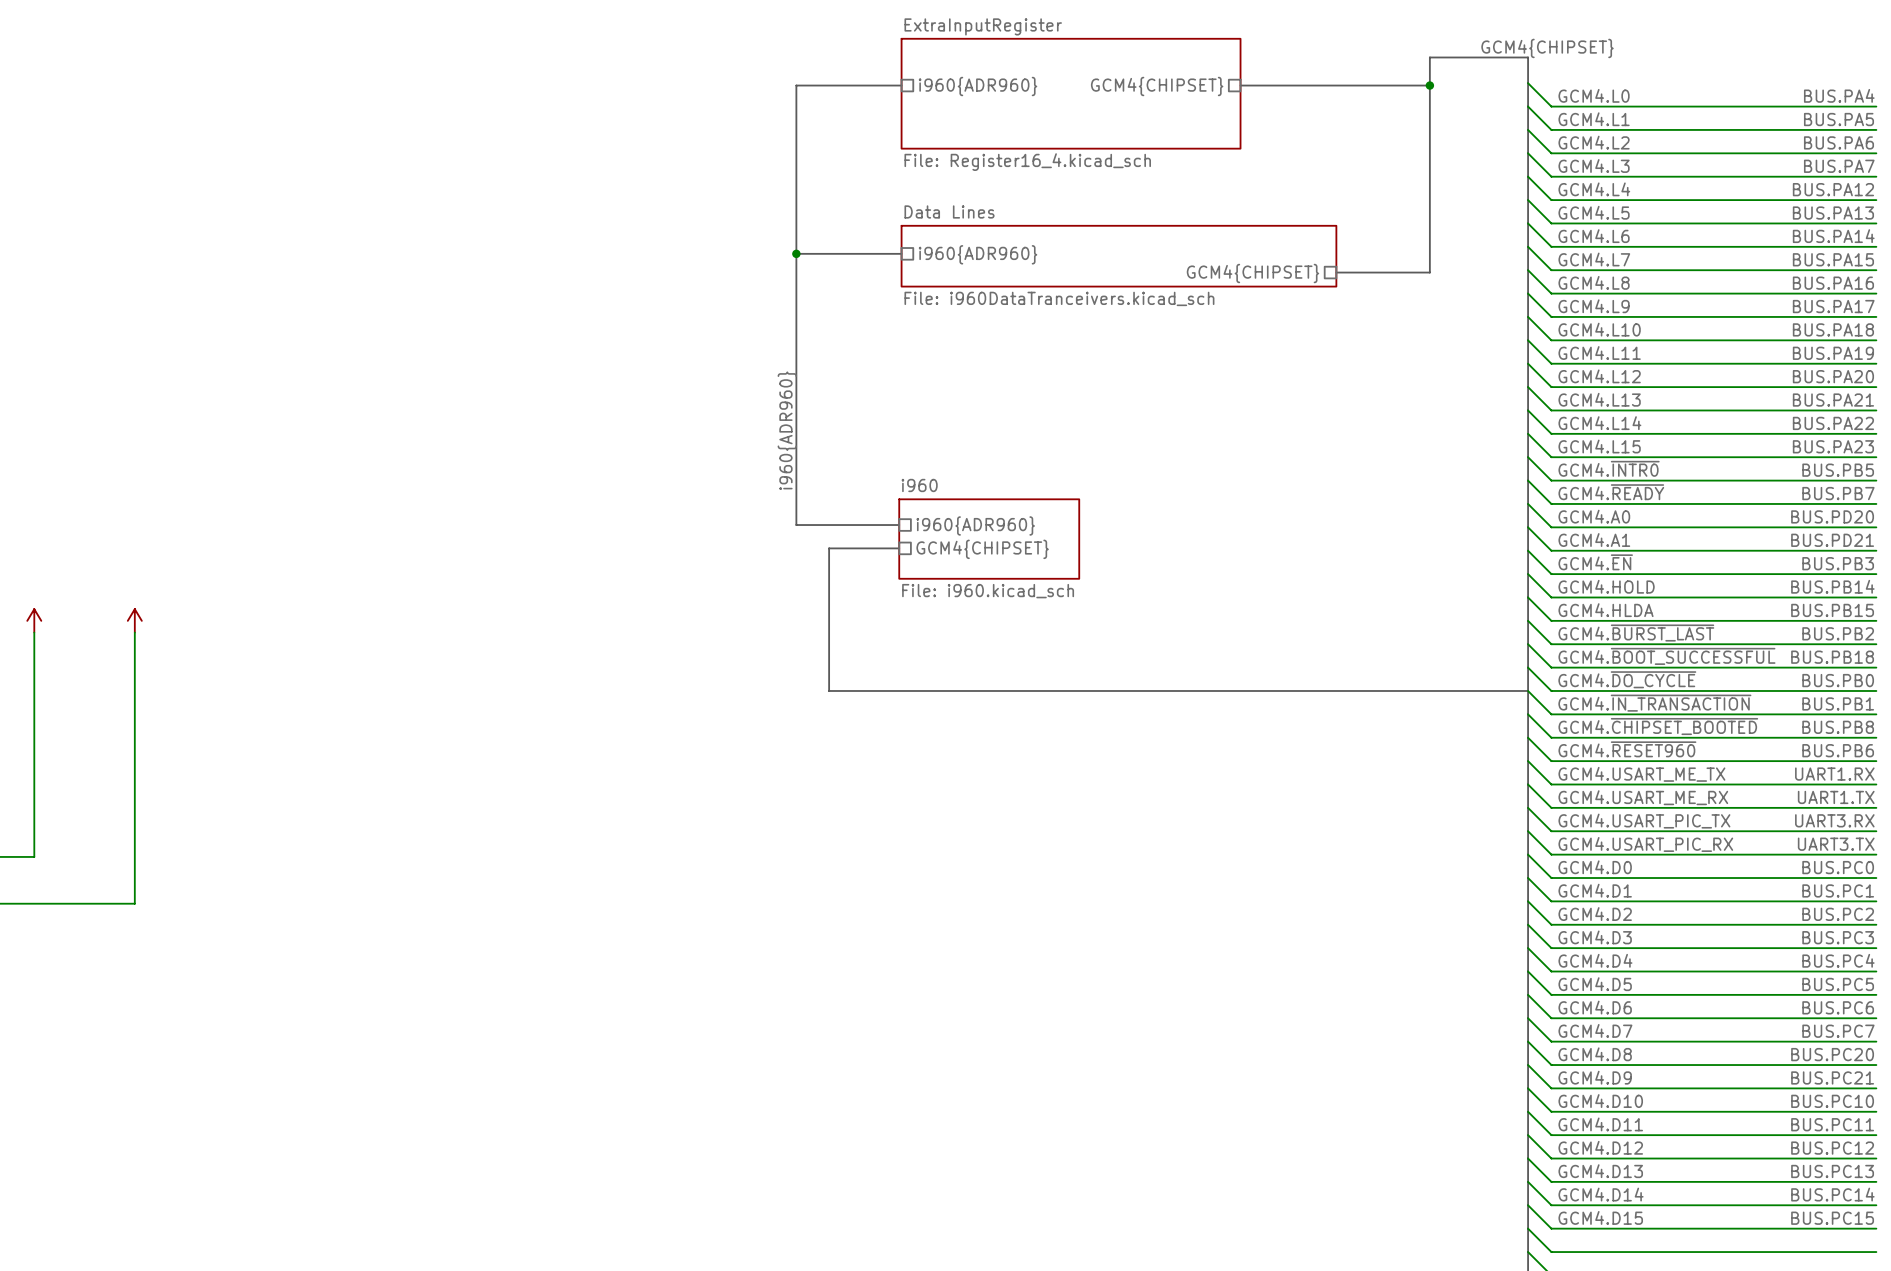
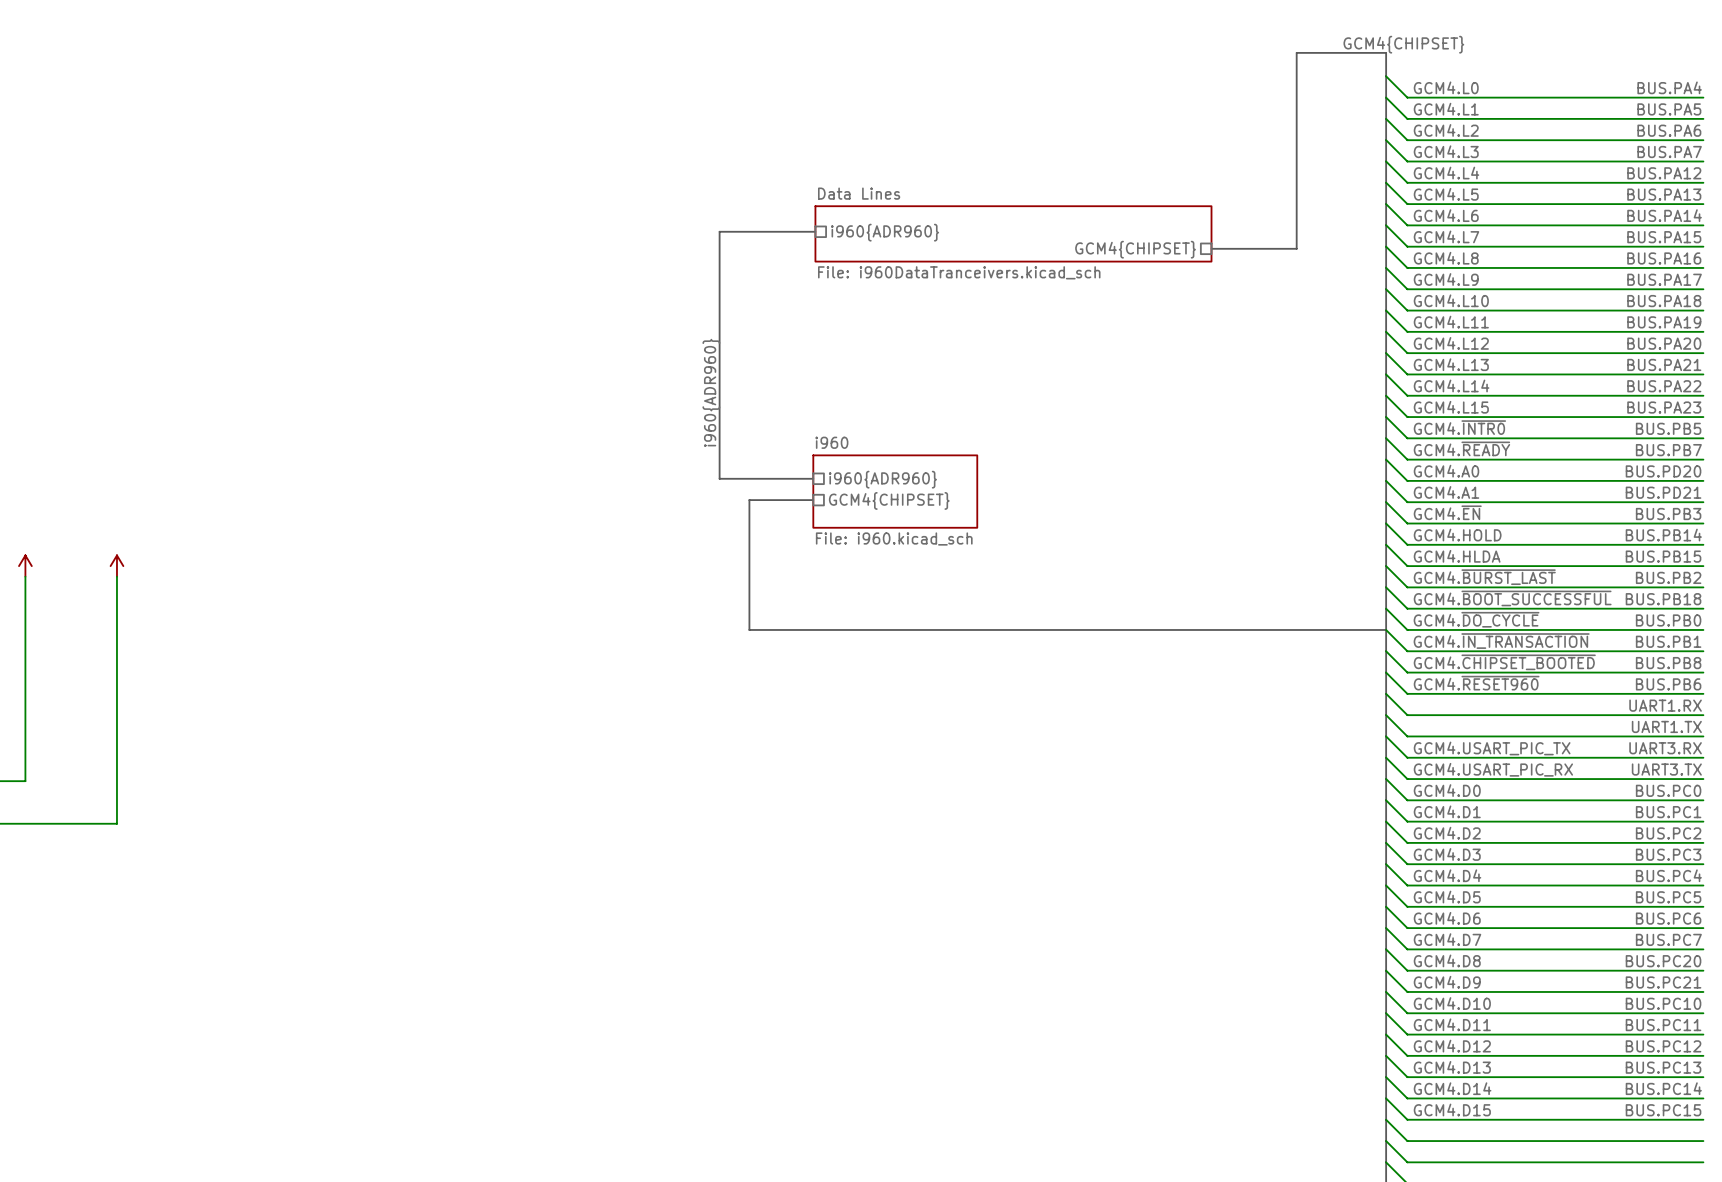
bus: (901, 85) (796, 85) (796, 253) -> none
bus: (1240, 85) (1429, 85) -> none
junction: (1429, 85) -> none
sheet pin: i960{ADR960} (978, 86) -> none
sheet pin: GCM4{CHIPSET} (1157, 86) -> none
sheet ExtraInputRegister: File: Register16_4.kicad_sch (1071, 93) -> none
junction: (796, 253) -> none
label: GCM4.USART_ME_TX (1641, 774) -> none
label: GCM4.USART_ME_RX (1643, 797) -> none

